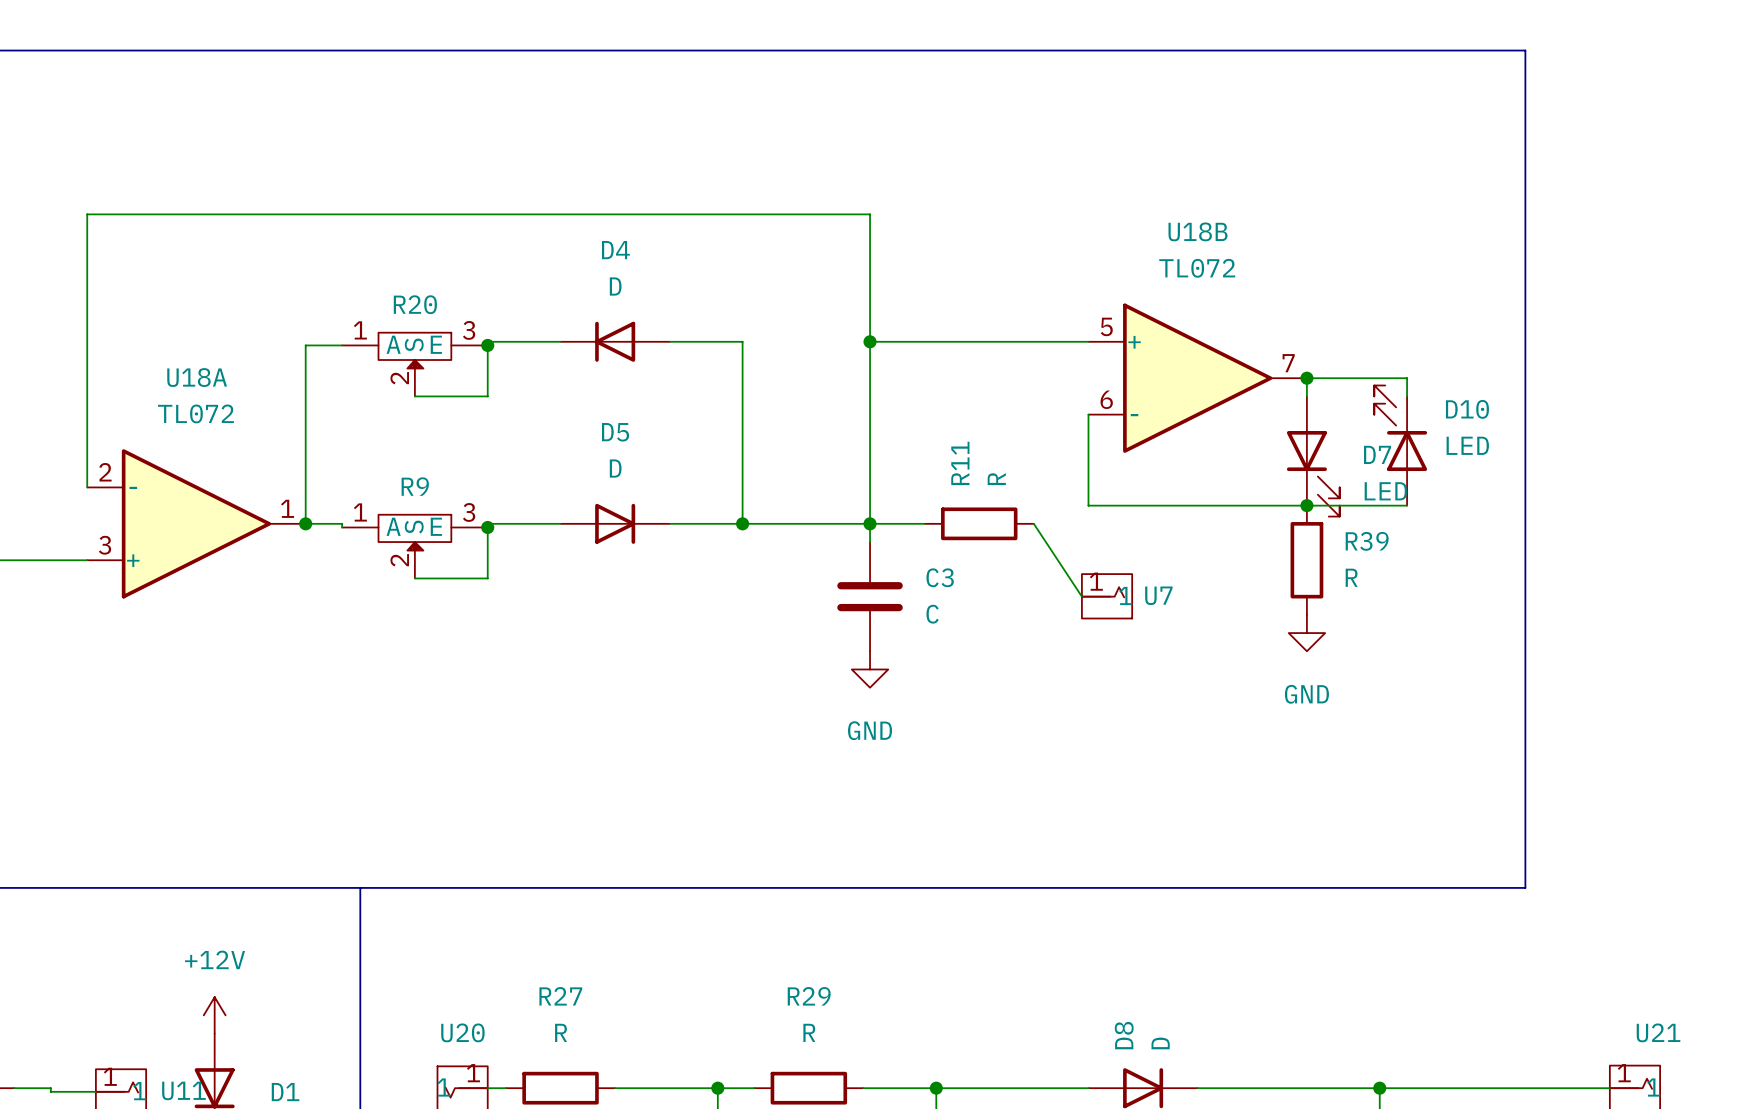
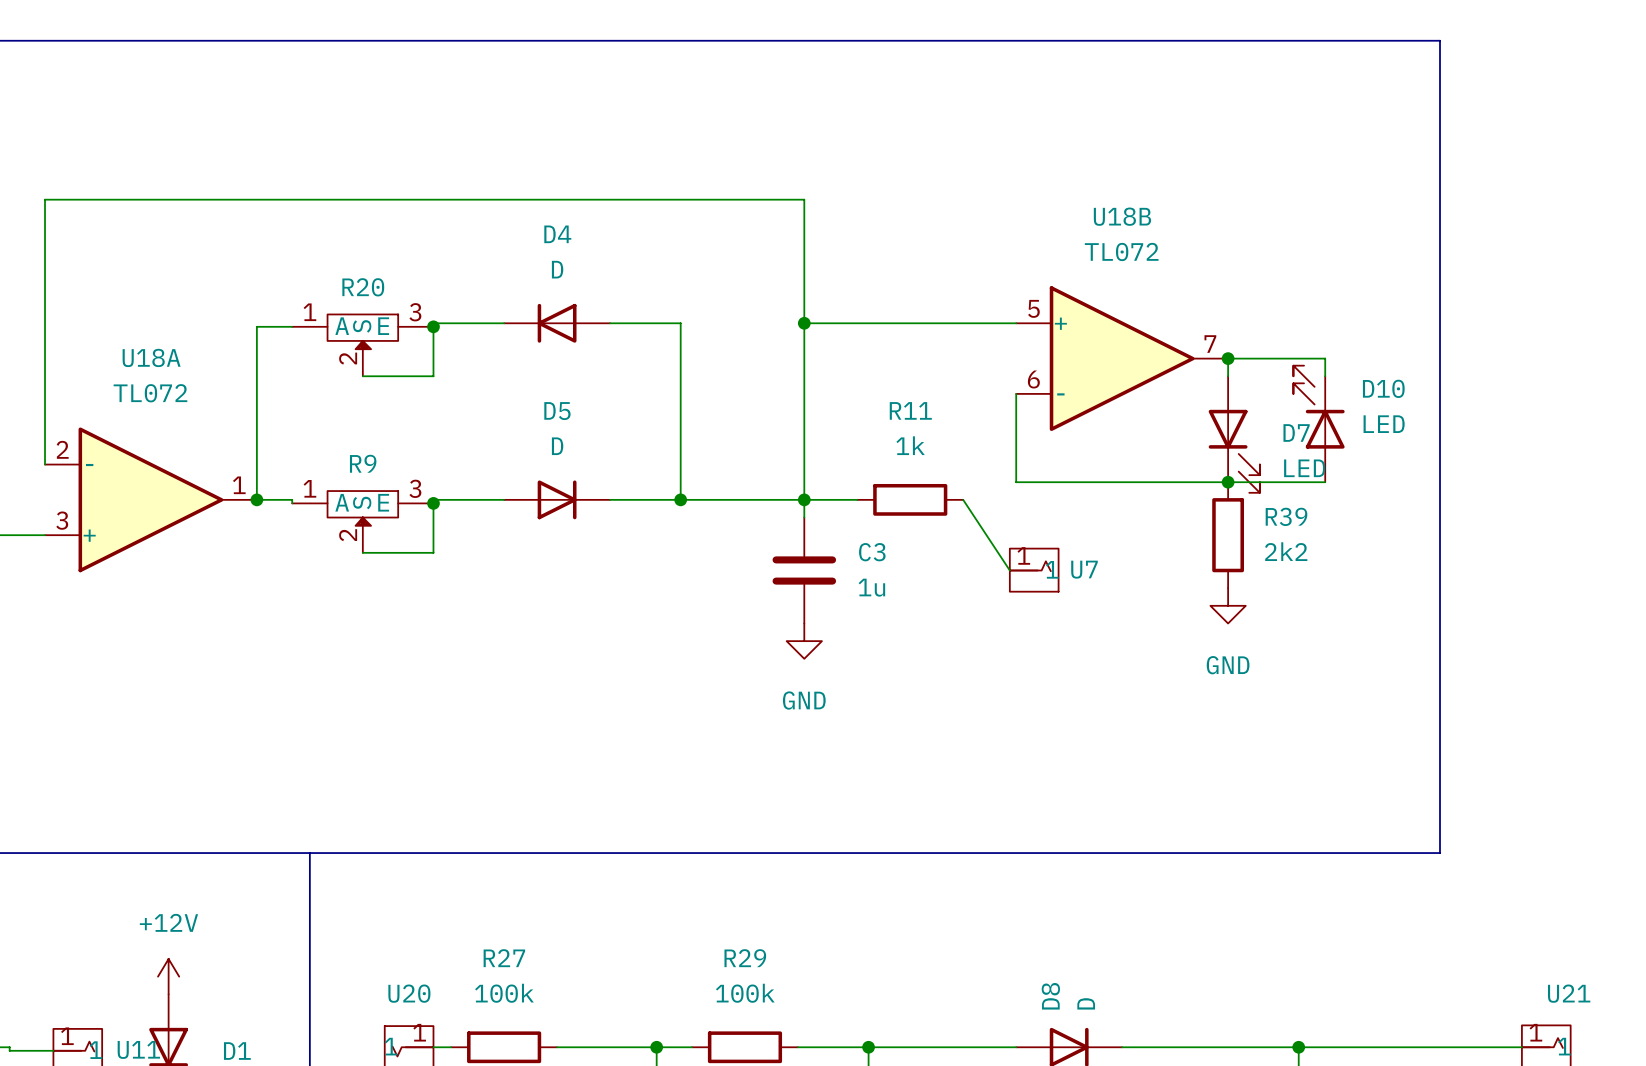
R11 name rotation: 0° (960, 463) -> 90° clockwise (910, 410)
R11 value: R (996, 479) -> 1k (910, 445)
R39 value: R (1351, 577) -> 2k2 (1286, 551)
C3 value: C (932, 614) -> 1u (871, 587)
R27 value: R (561, 1032) -> 100k (504, 993)
R29 value: R (809, 1032) -> 100k (745, 993)

